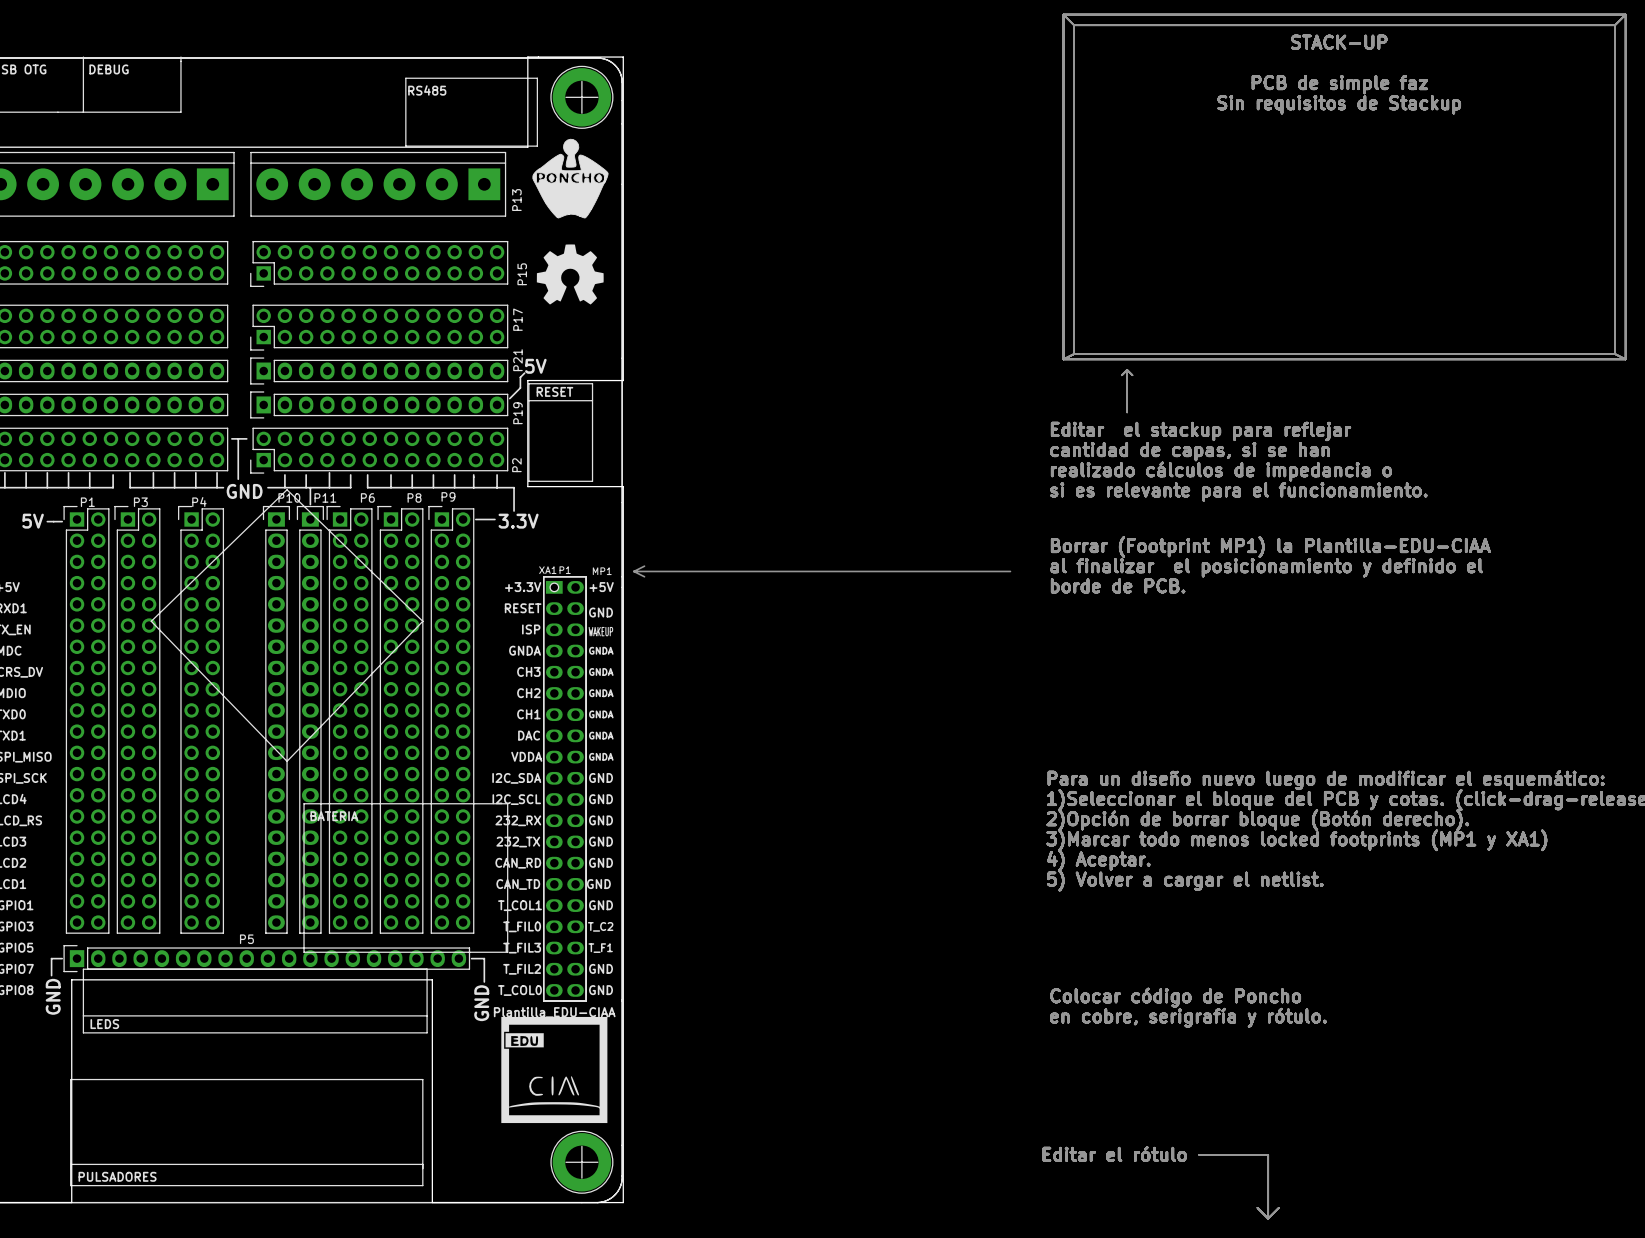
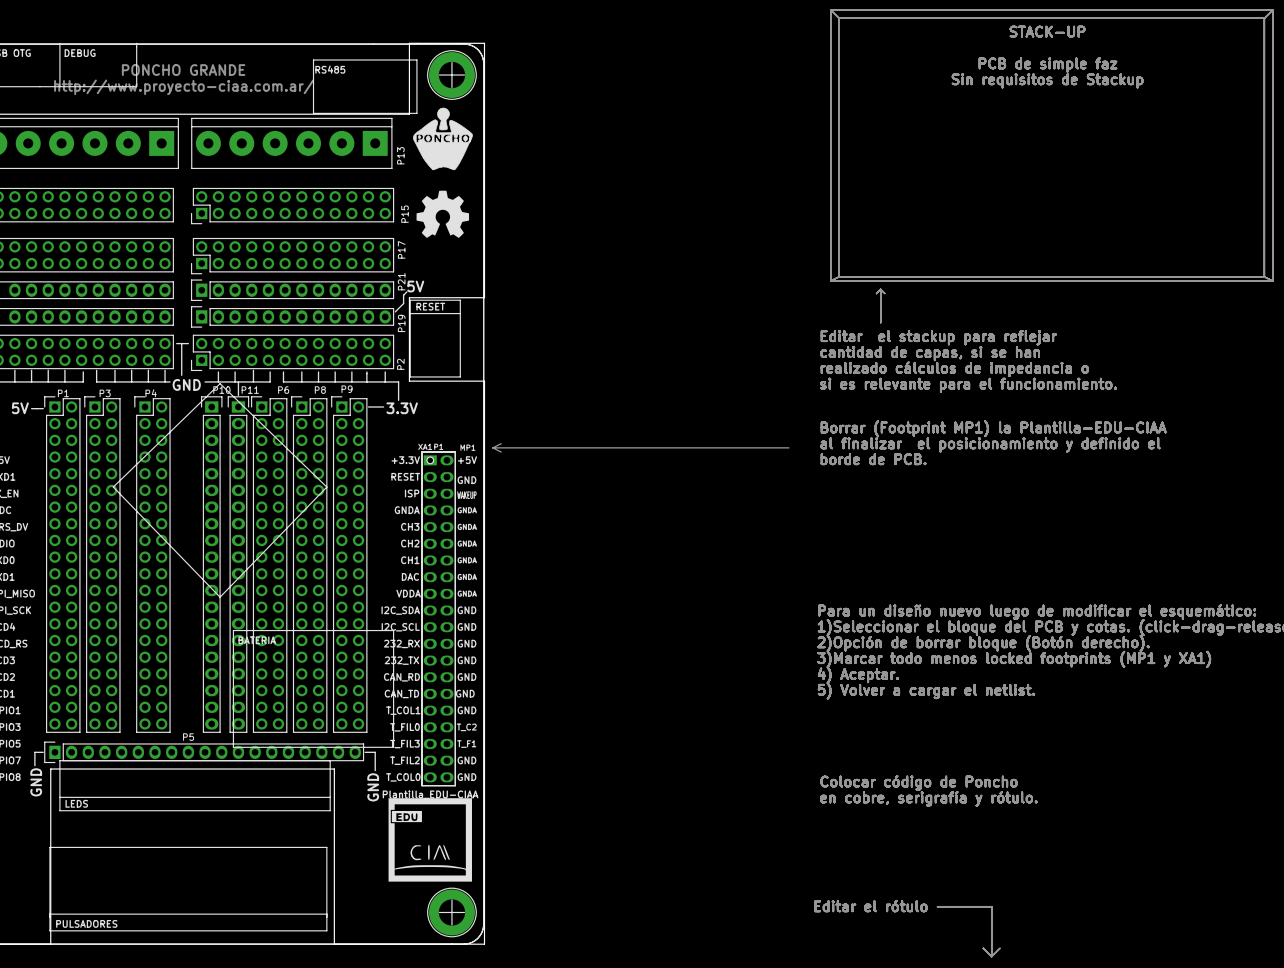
text: none -> PONCHO GRANDE (183, 70)
text: none -> http://www.proyecto-ciaa.com.ar/ (184, 87)

